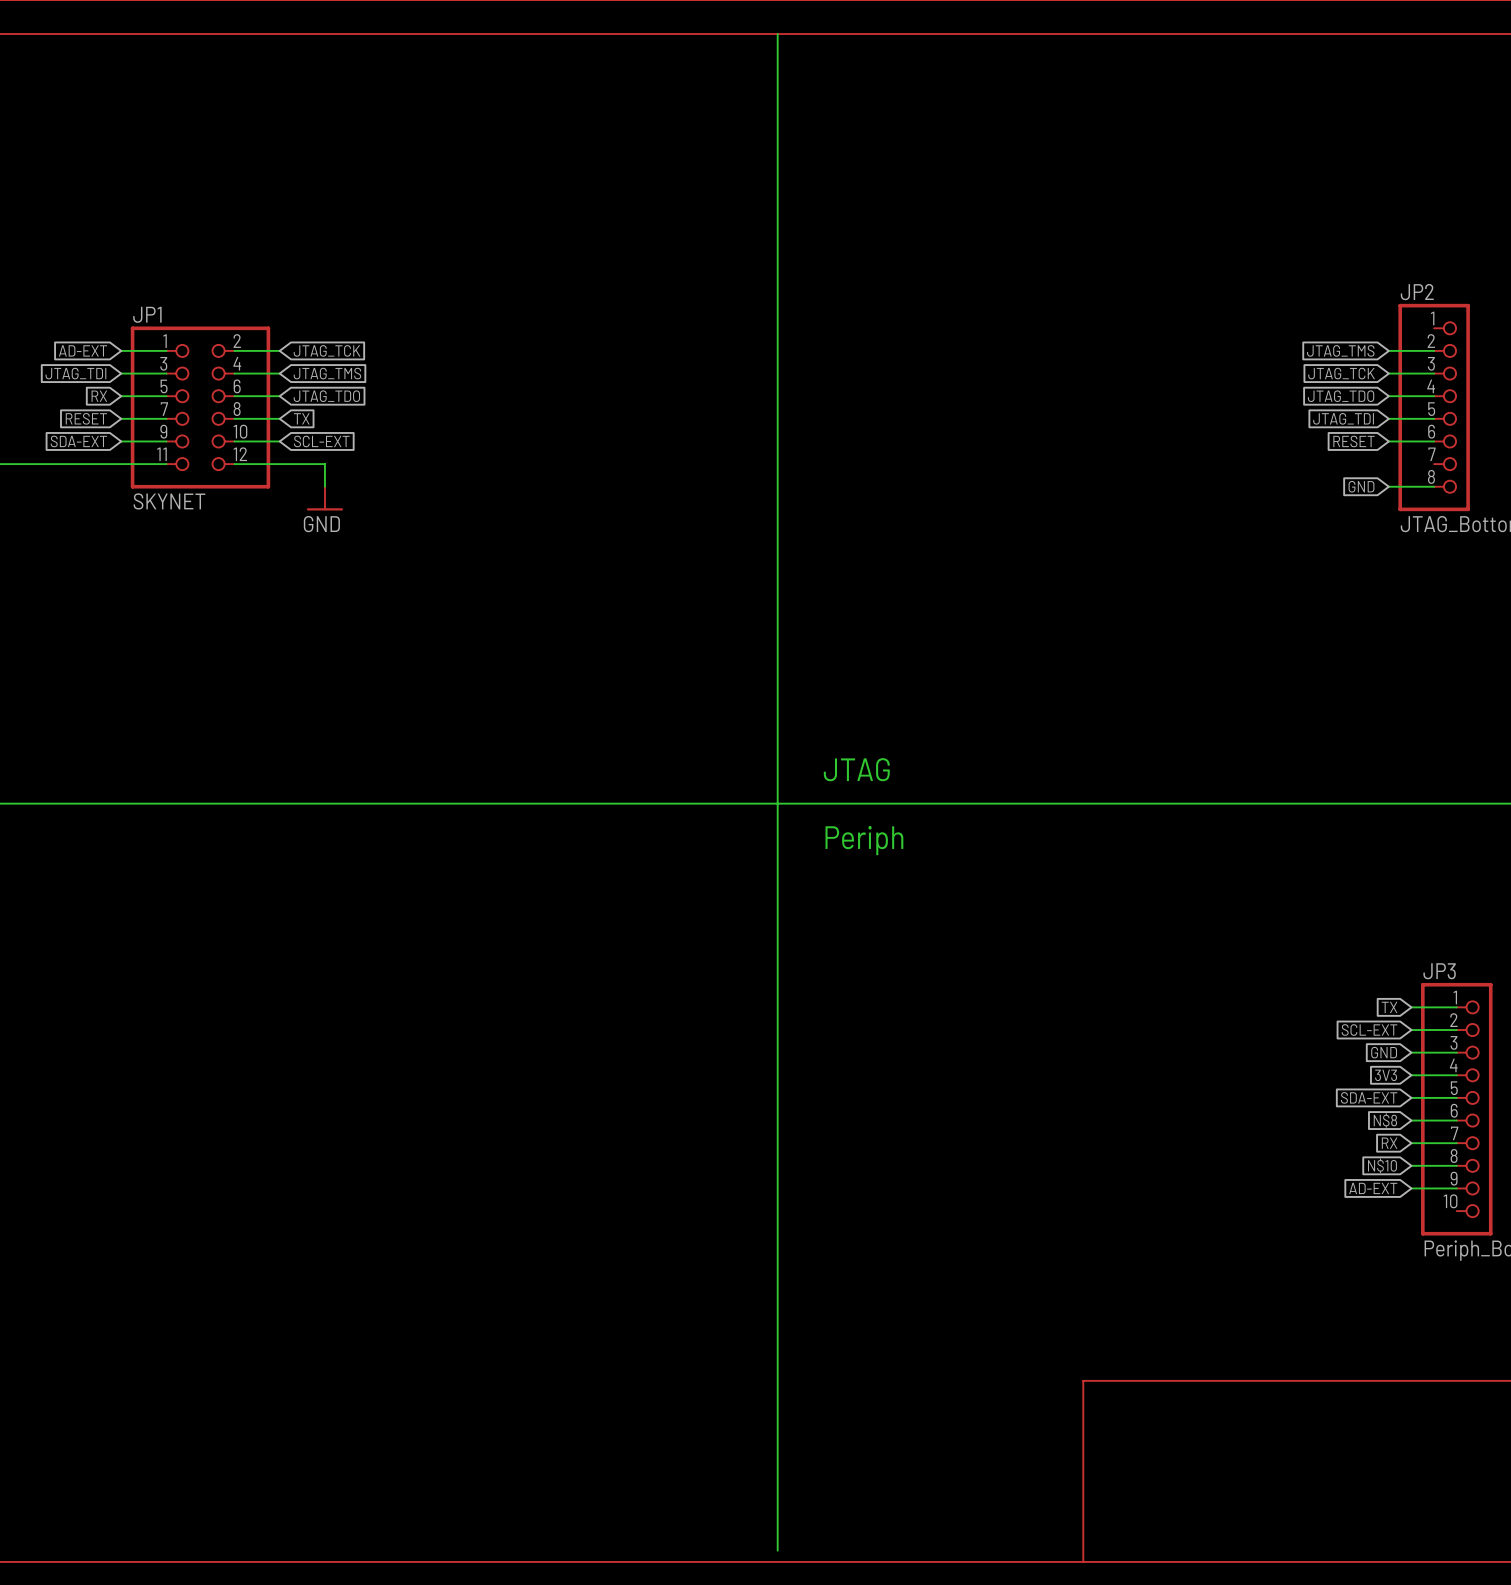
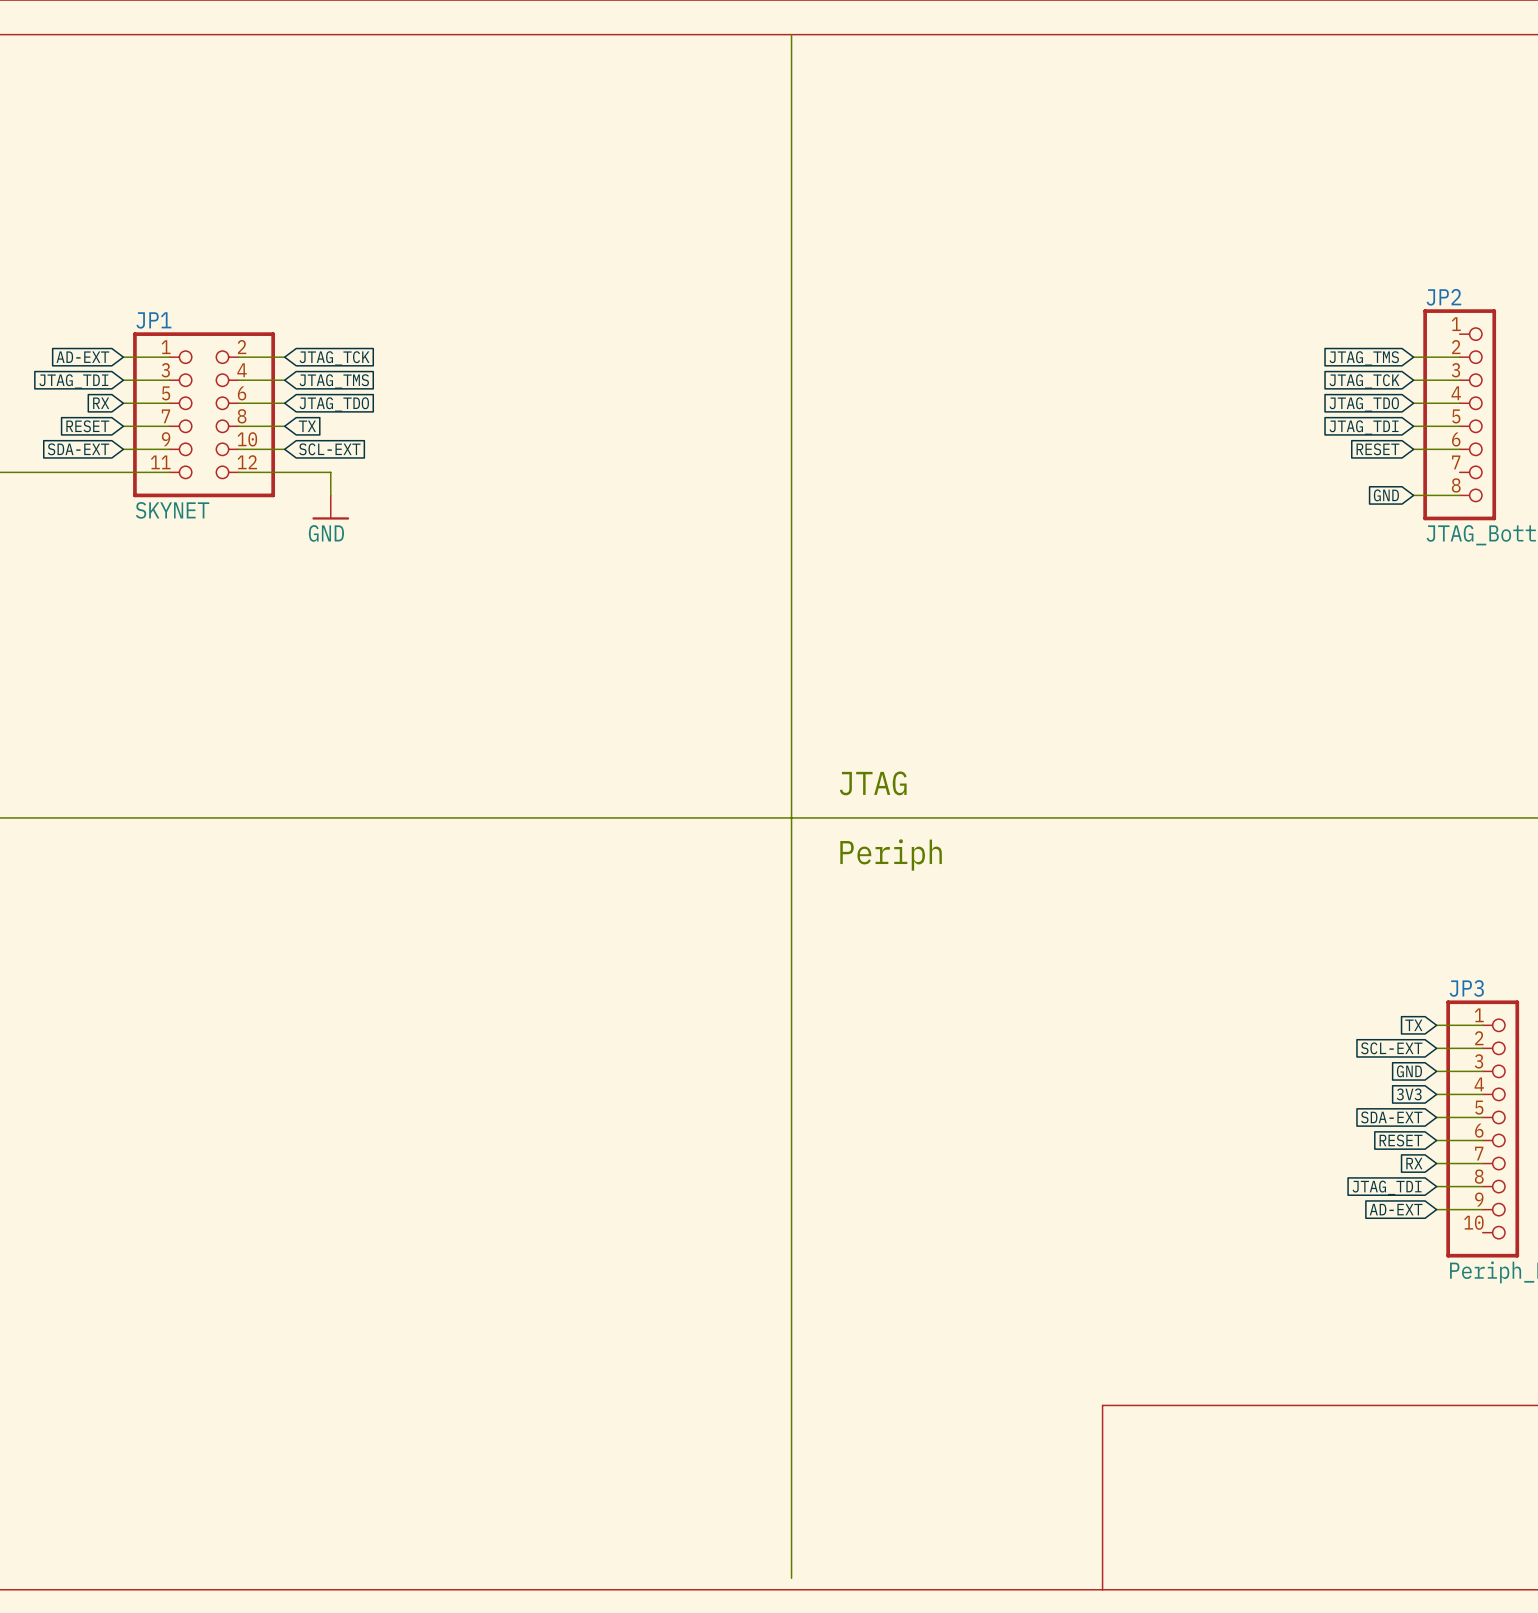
global label: N$8 (1385, 1120) -> RESET (1401, 1140)
global label: N$10 (1382, 1165) -> JTAG_TDI (1387, 1187)

